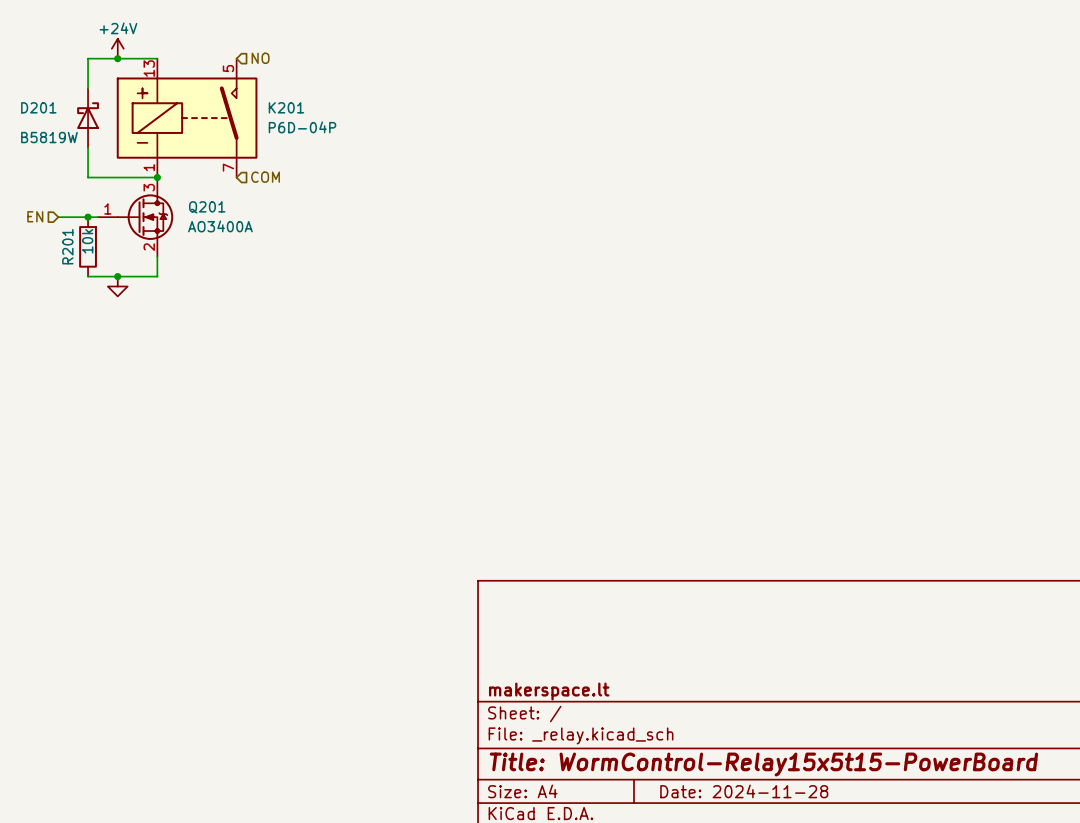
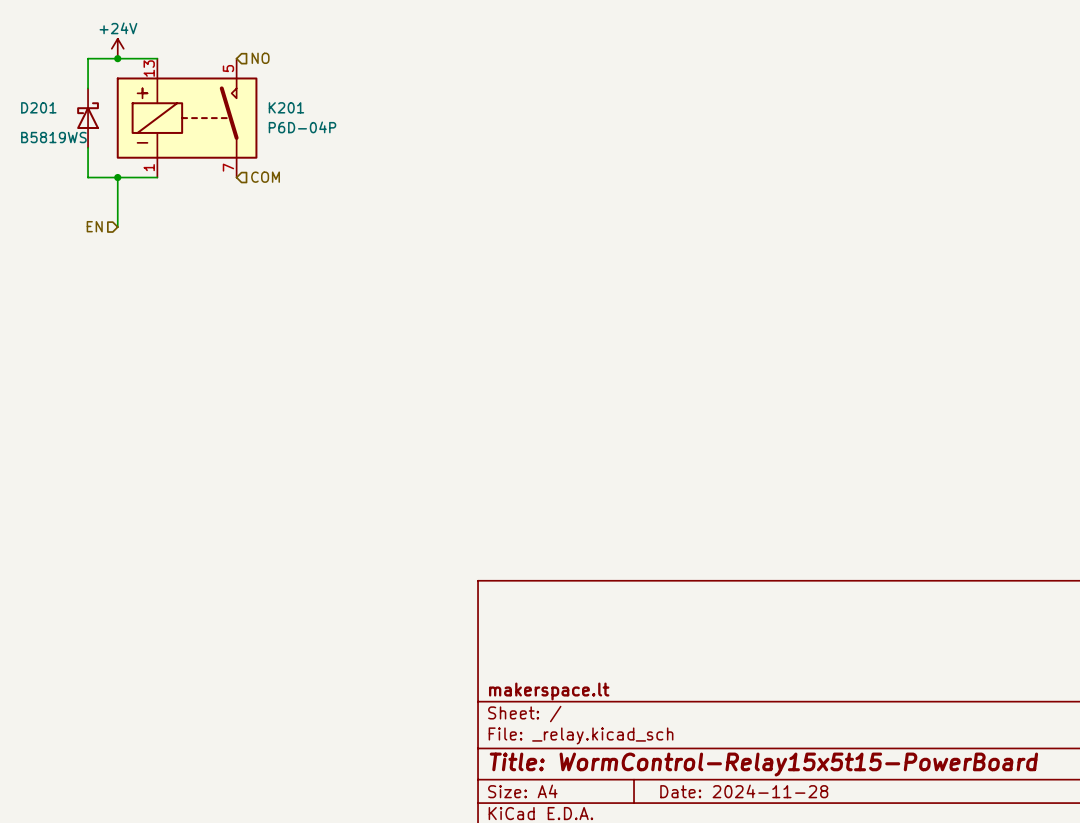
D201 value: B5819W (49, 137) -> B5819WS (53, 137)
wire: none -> (117, 177) (117, 227)
junction: none -> (117, 177)
junction: (157, 177) -> none
hierarchical label position: EN (35, 216) -> EN (94, 226)
wire: (58, 217) (97, 217) -> none
junction: (88, 217) -> none
Q201: AO3400A (135, 217) -> none
R201: 10k (88, 246) -> none
wire: (157, 256) (157, 276) (88, 276) -> none
junction: (117, 276) -> none
power symbol: (117, 286) -> none

